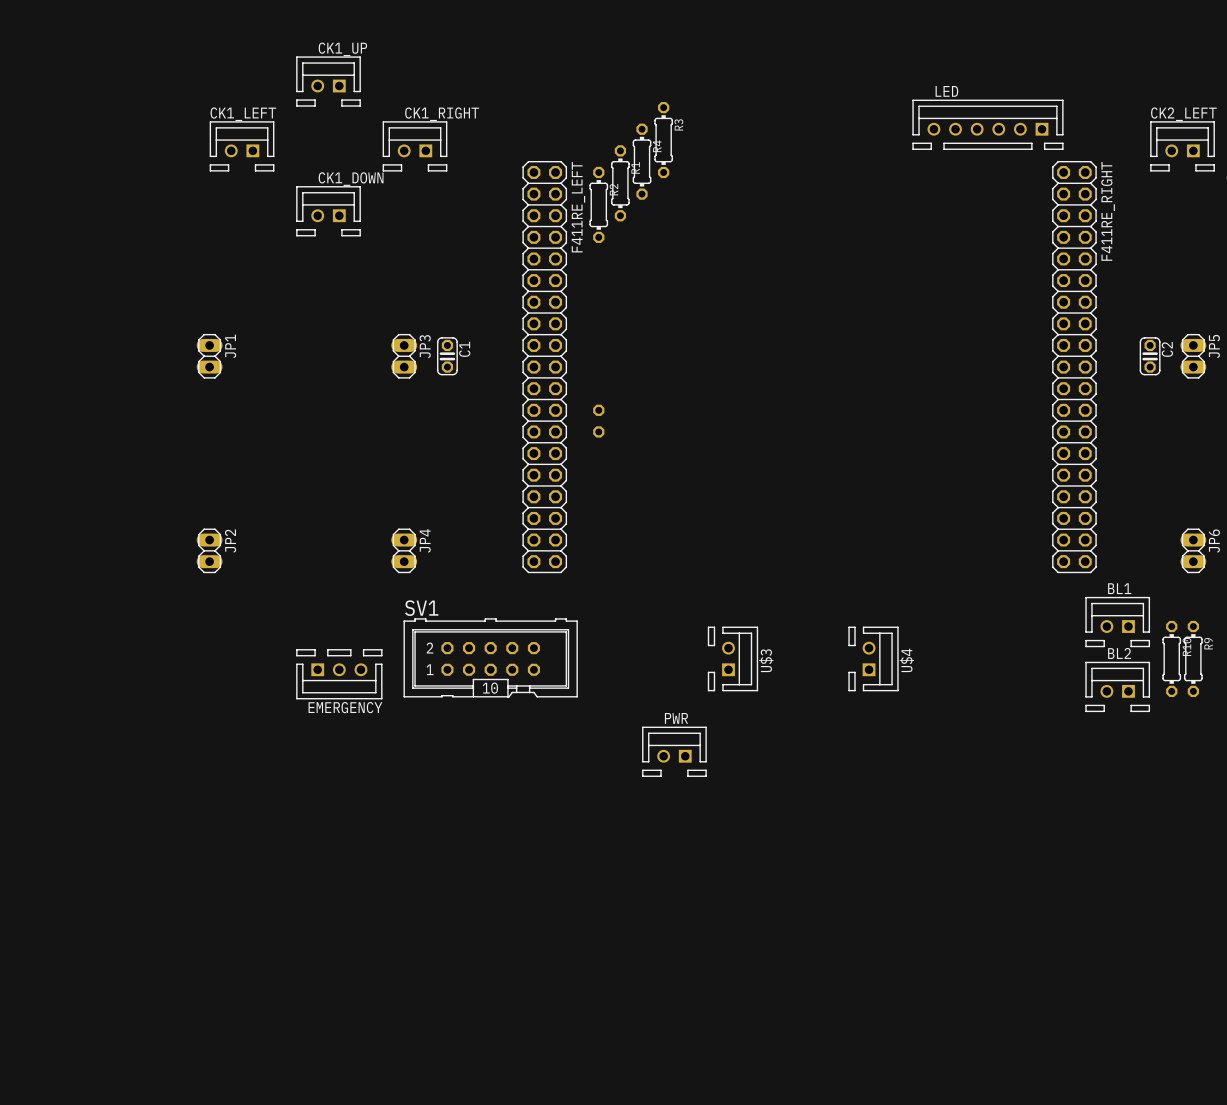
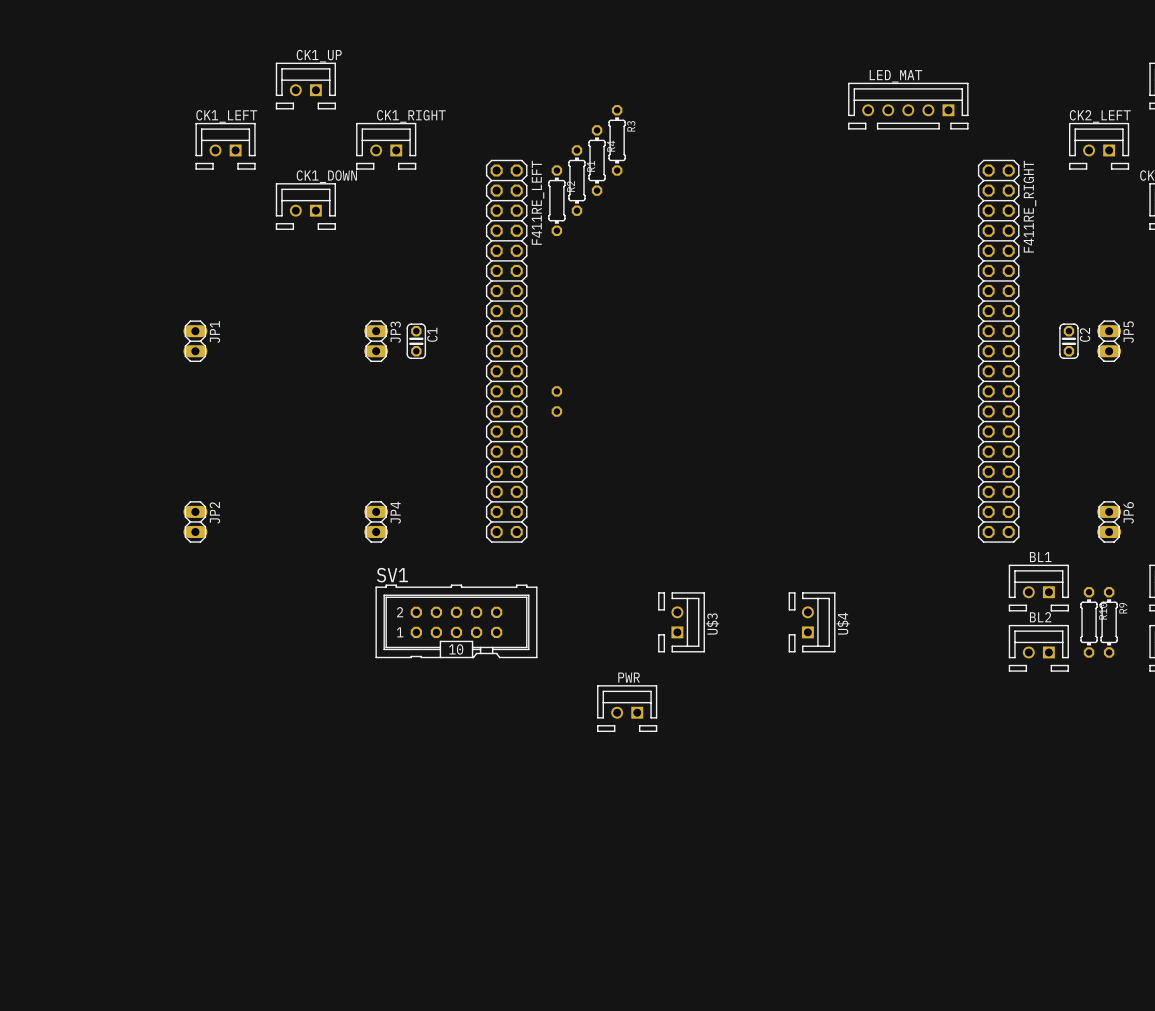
LED_MAT: none -> (908, 106)
LED: (987, 124) -> none
EMERGENCY: (339, 674) -> none

